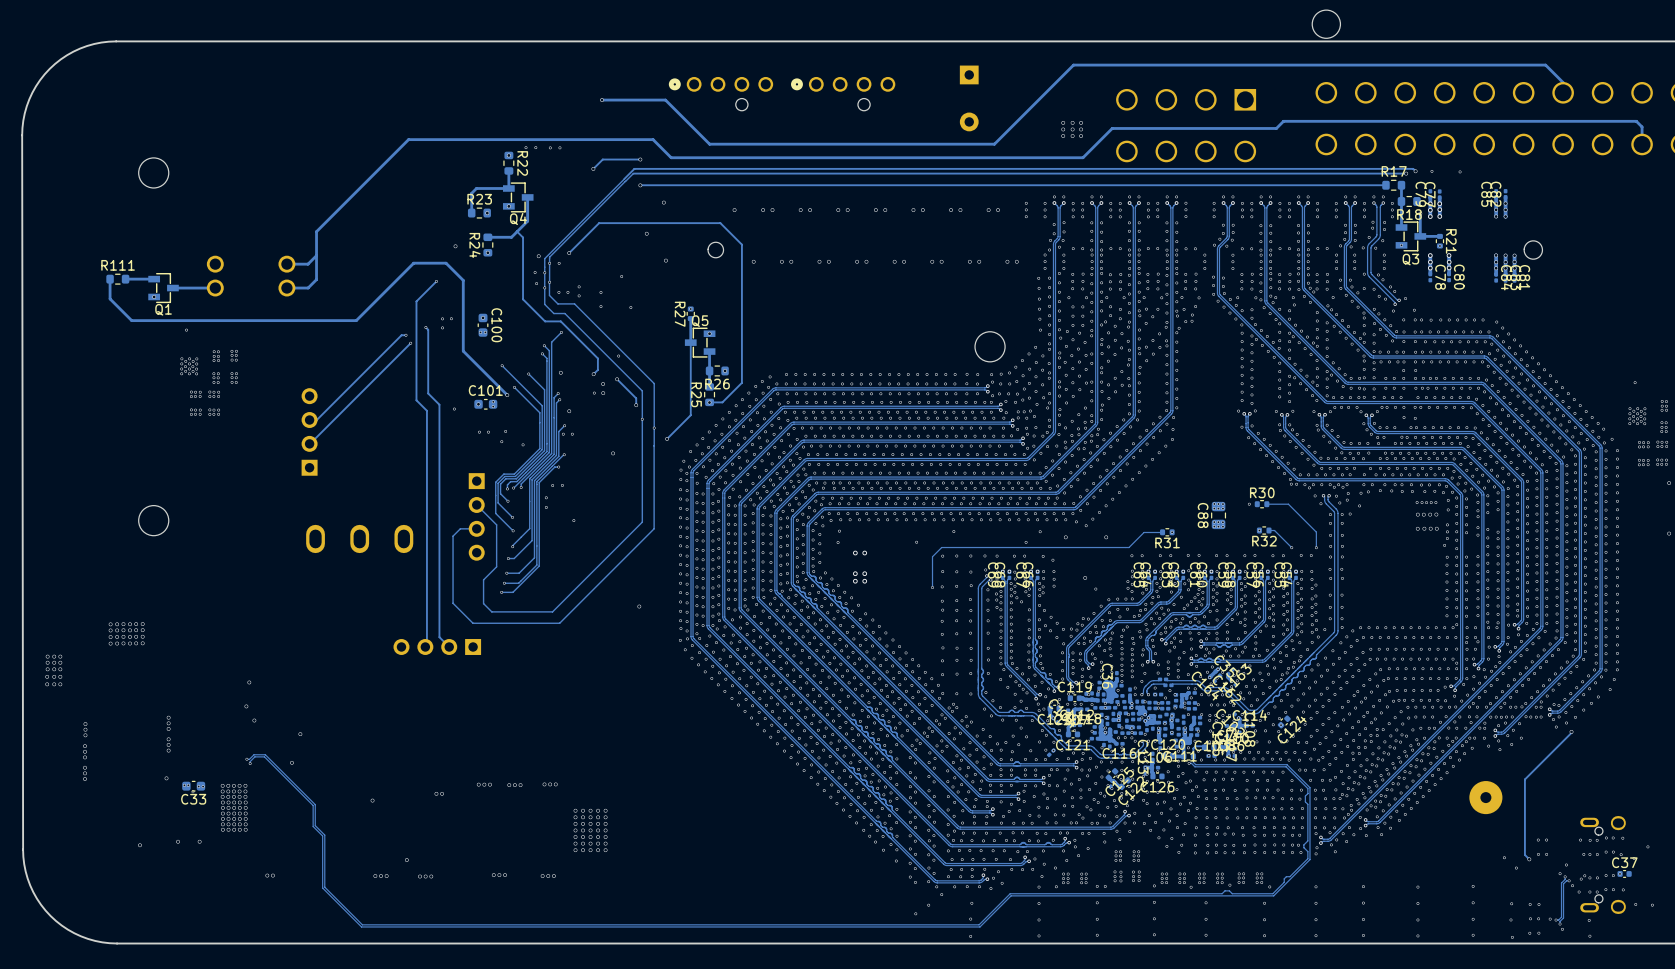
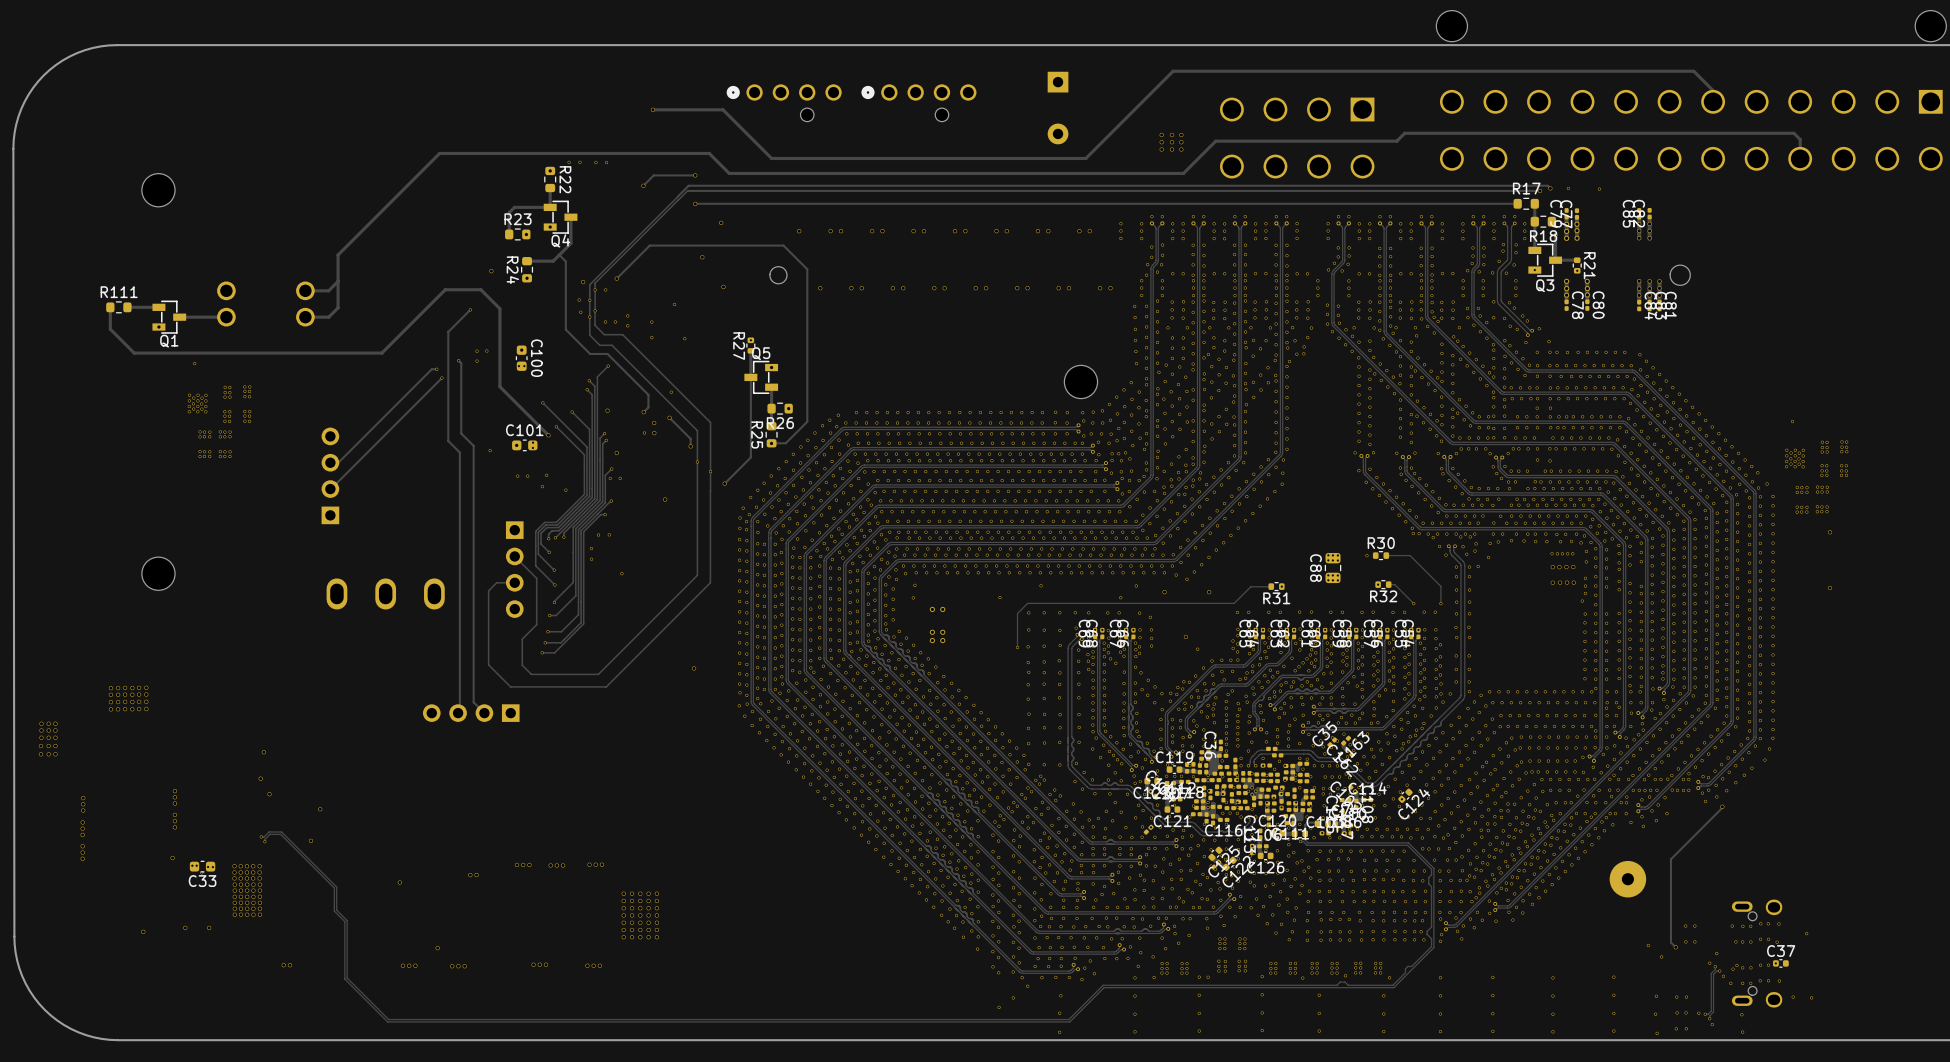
track: (1218, 669) (1209, 677) -> none
C35 rotation: 0° (1217, 673) -> 90° clockwise (1332, 742)
C164: (1212, 678) -> none

